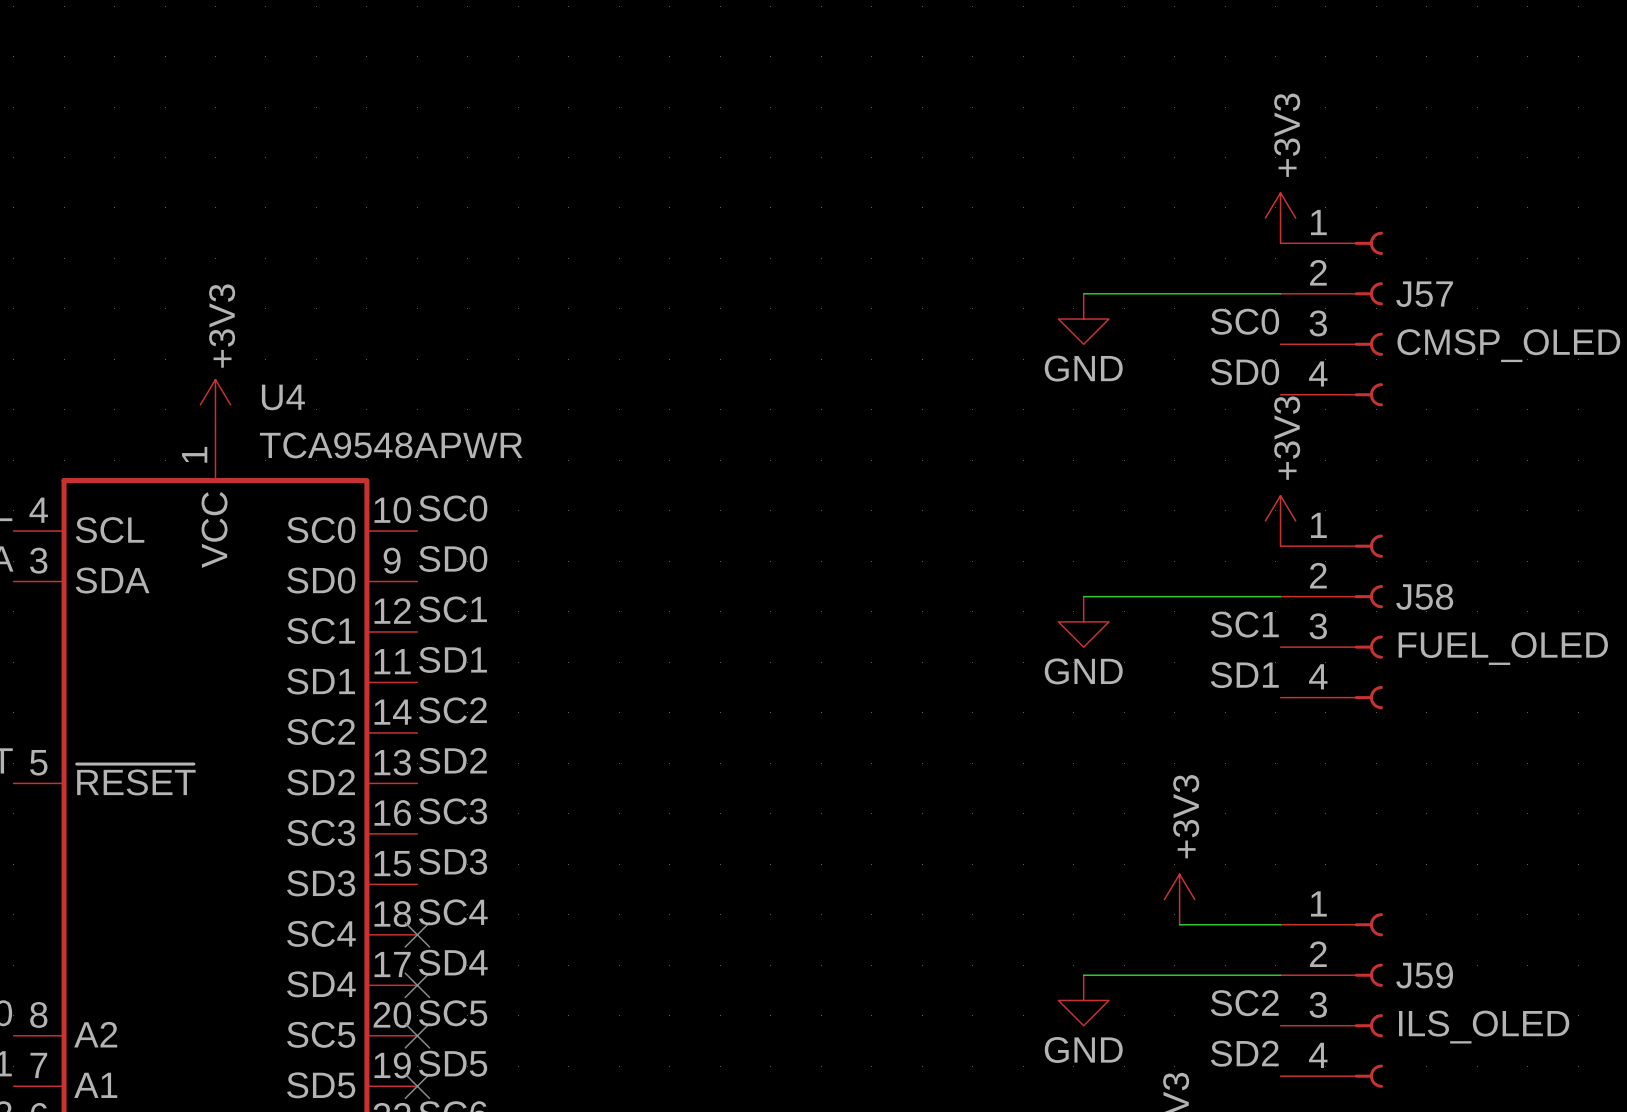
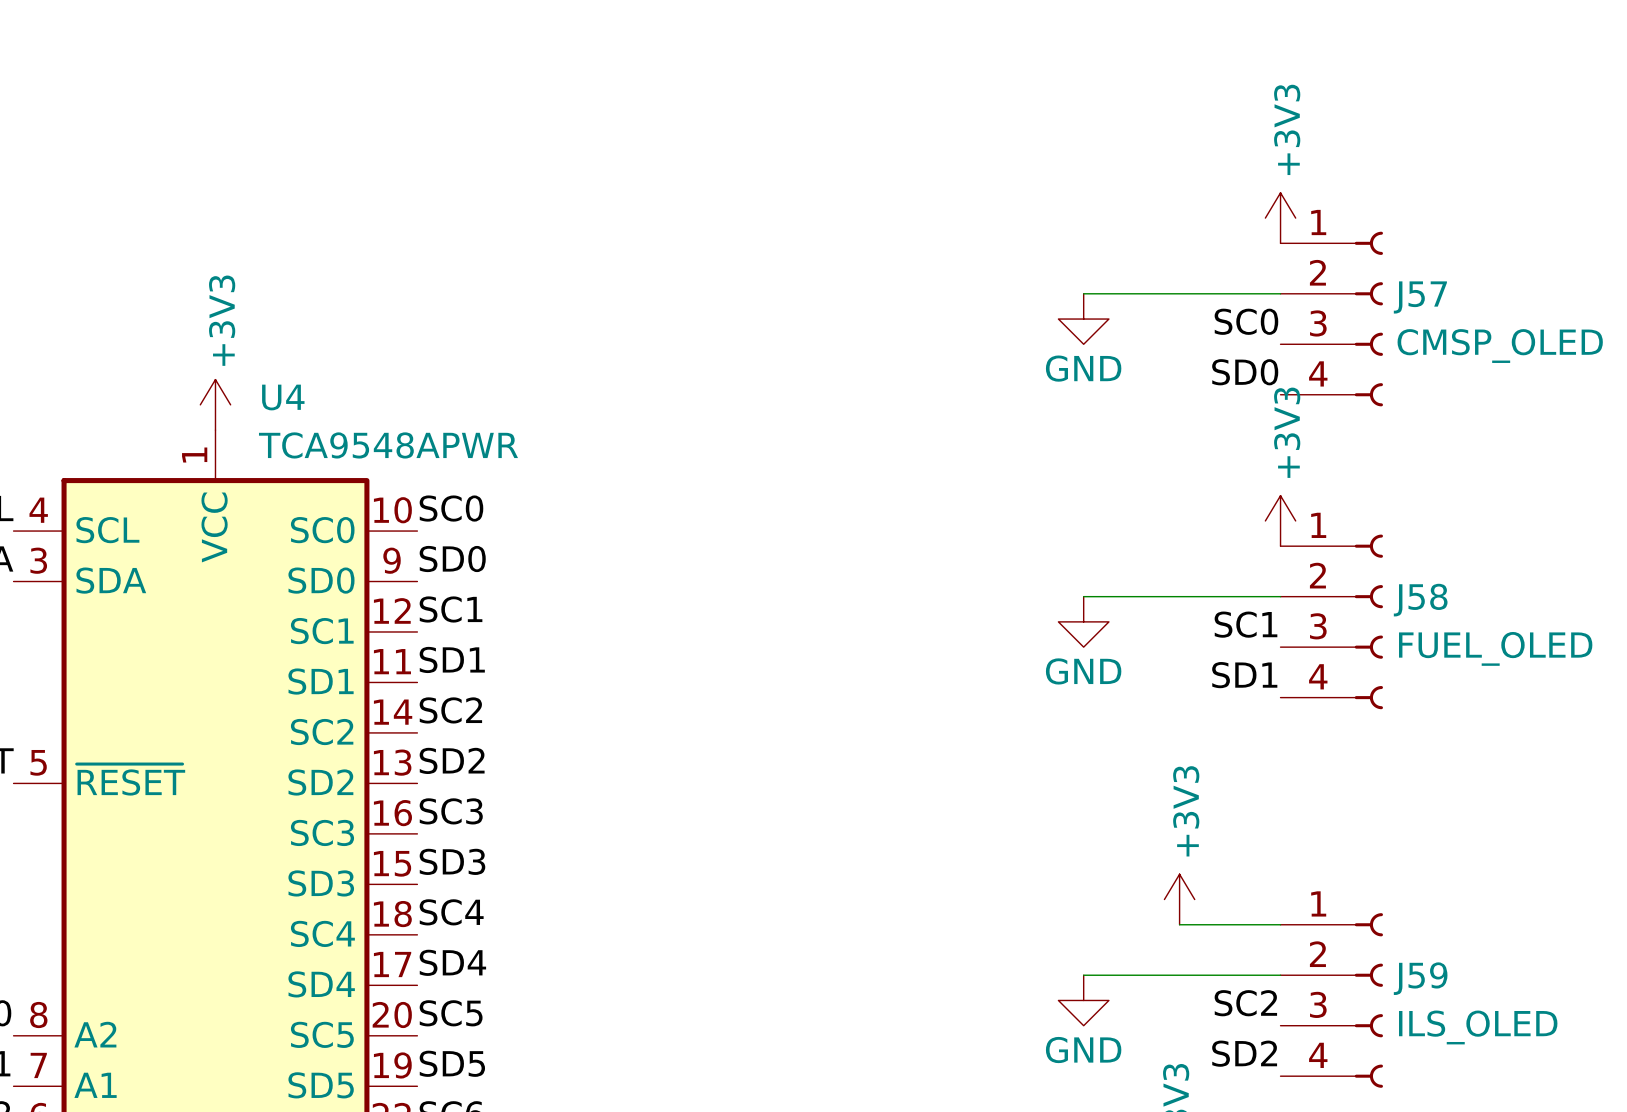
no-connect mark: (417, 934) -> none
no-connect mark: (417, 985) -> none
no-connect mark: (417, 1035) -> none
no-connect mark: (417, 1086) -> none

